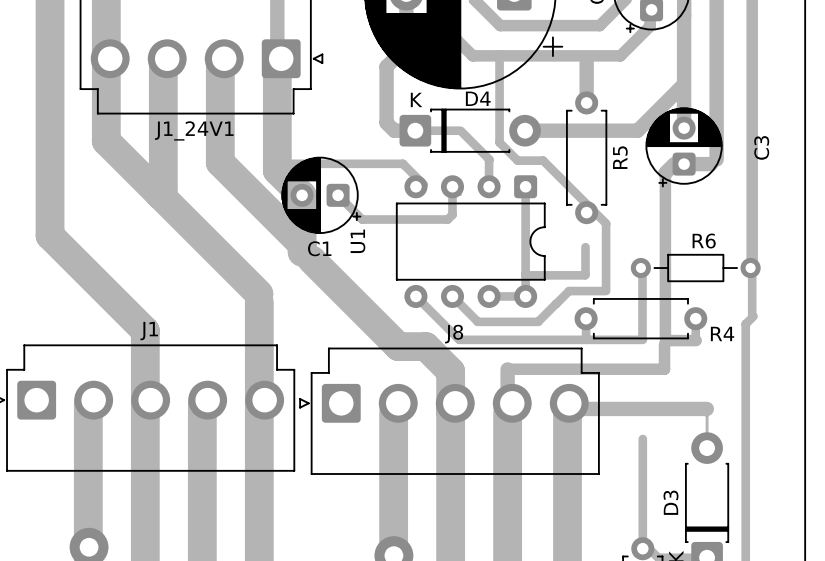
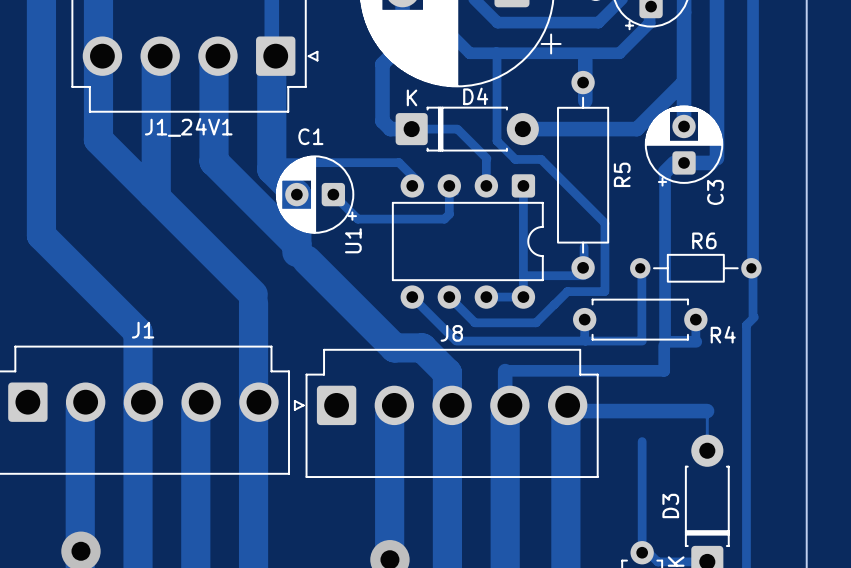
R5 footprint: [566, 91, 608, 225] -> [557, 70, 610, 280]
C3 name position: C3 (761, 147) -> C3 (715, 192)
C1 name position: C1 (319, 248) -> C1 (310, 136)

